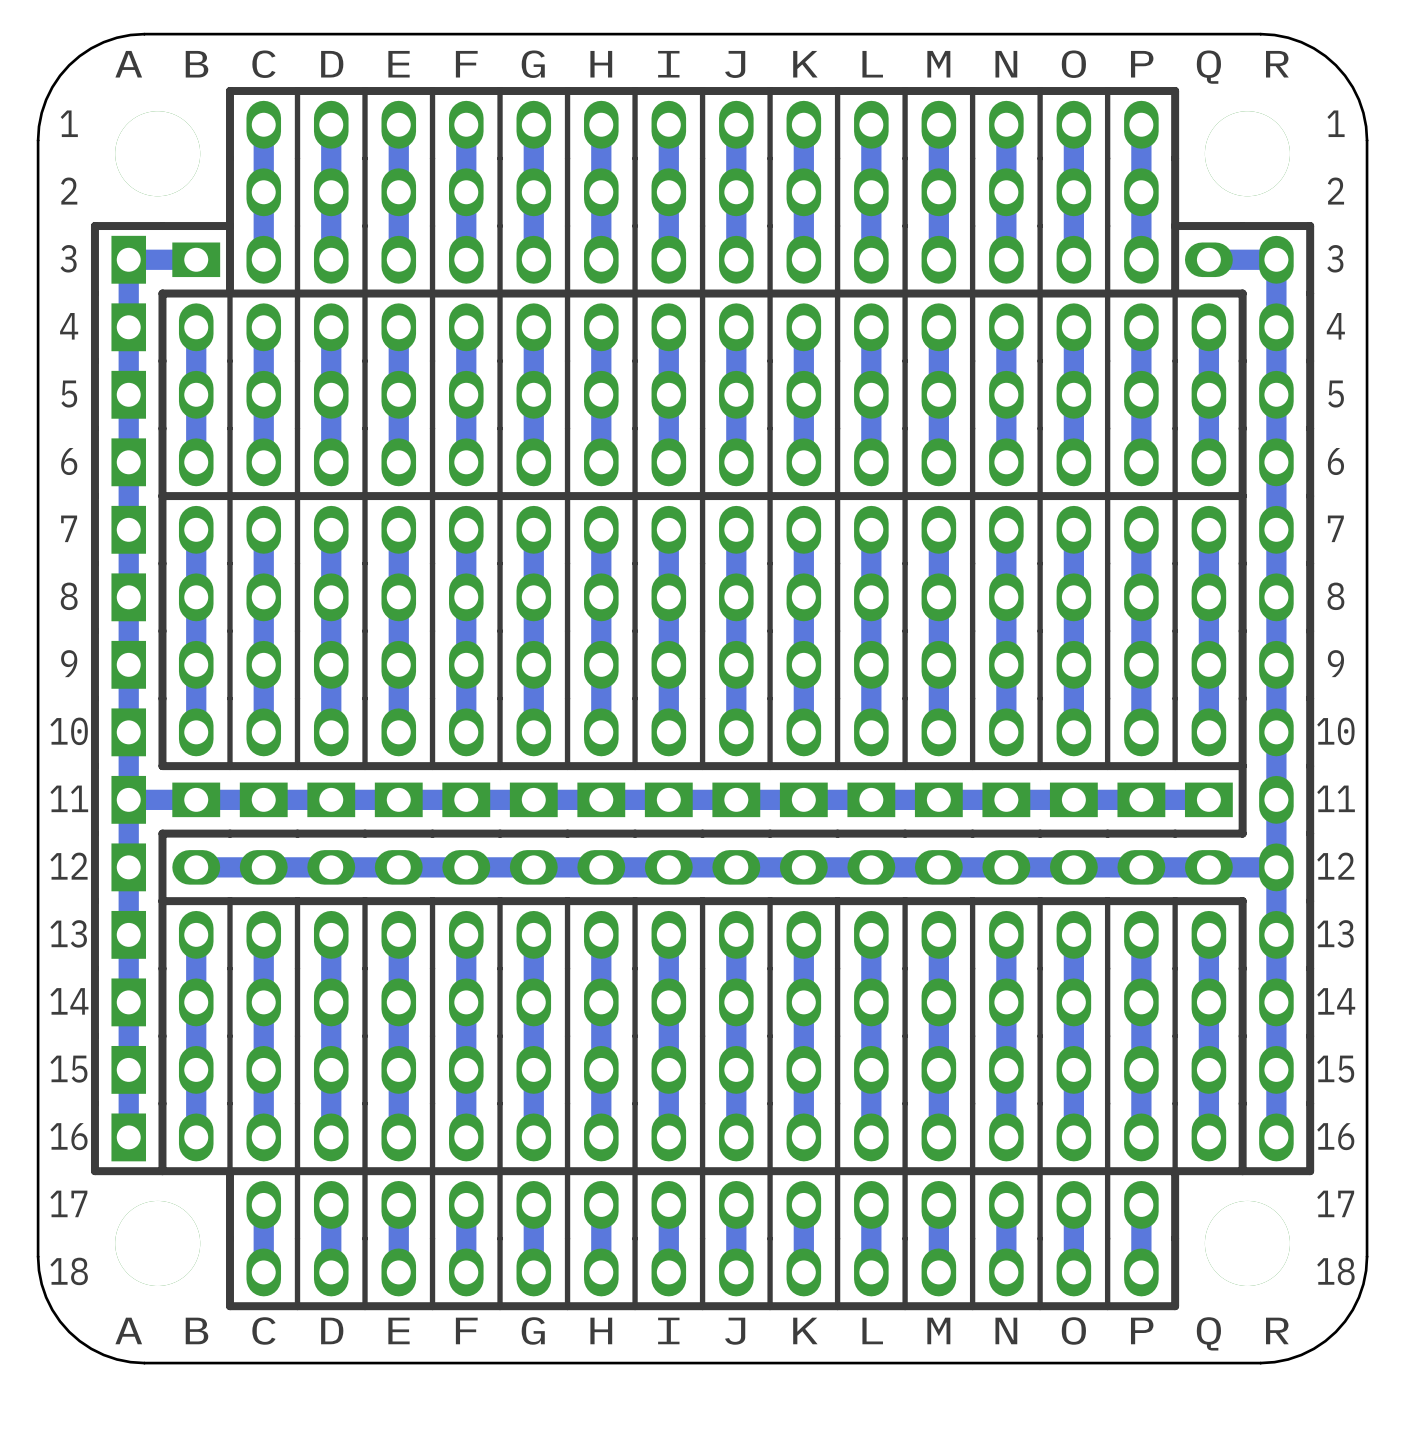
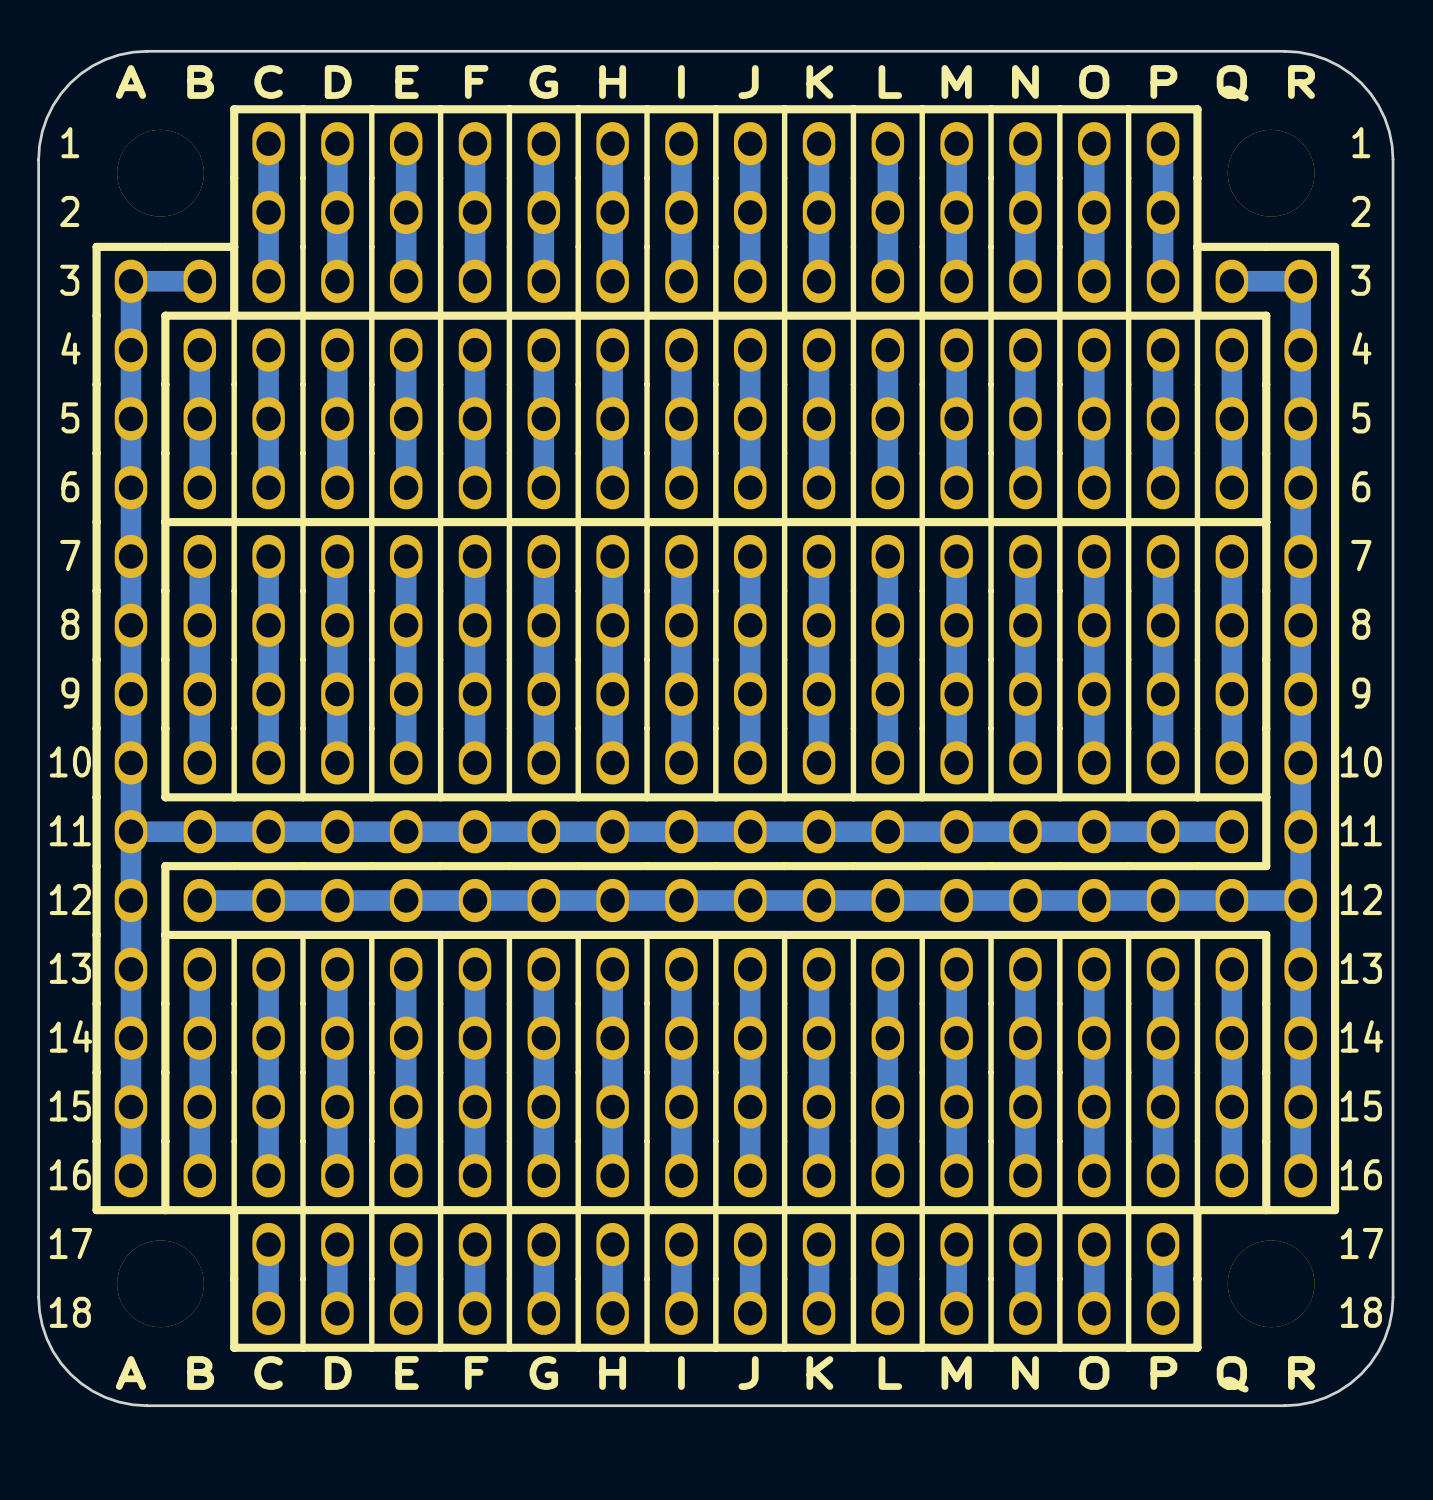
part footprint: [111, 100, 1294, 1297] -> [114, 122, 1317, 1336]

